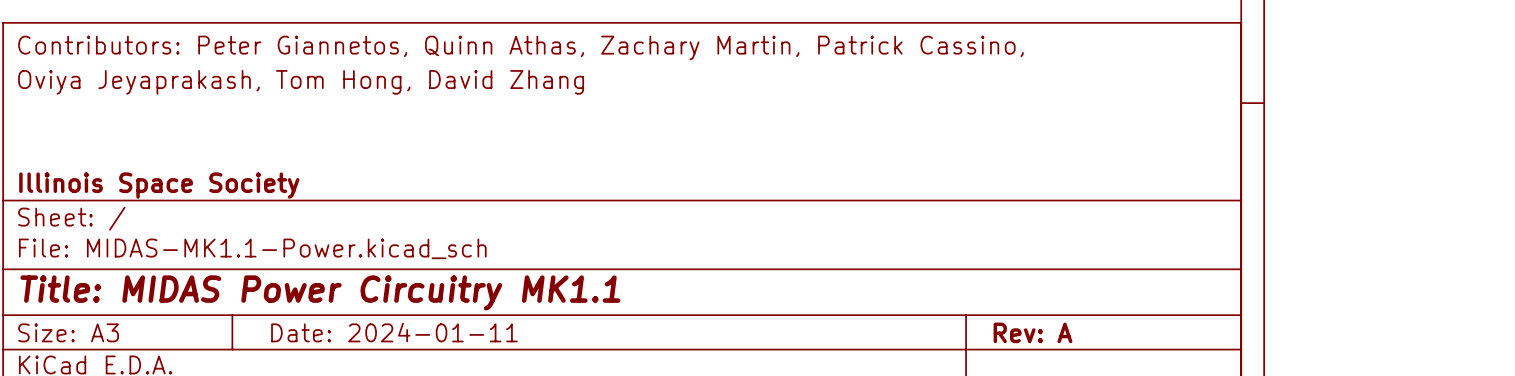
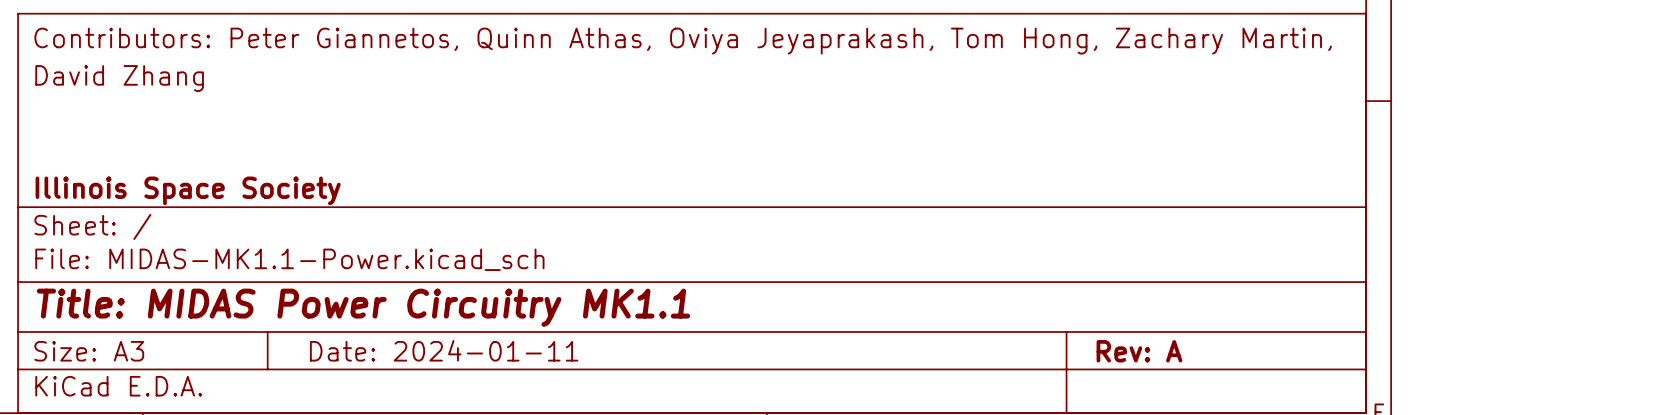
title block: Contributors: Peter Giannetos, Quinn Athas, Zachary Martin, Patrick Cassino, (520, 48) -> Contributors: Peter Giannetos, Quinn Athas, Oviya Jeyaprakash, Tom Hong, Zachary Martin, (683, 41)
title block: Oviya Jeyaprakash, Tom Hong, David Zhang (301, 82) -> David Zhang (119, 78)

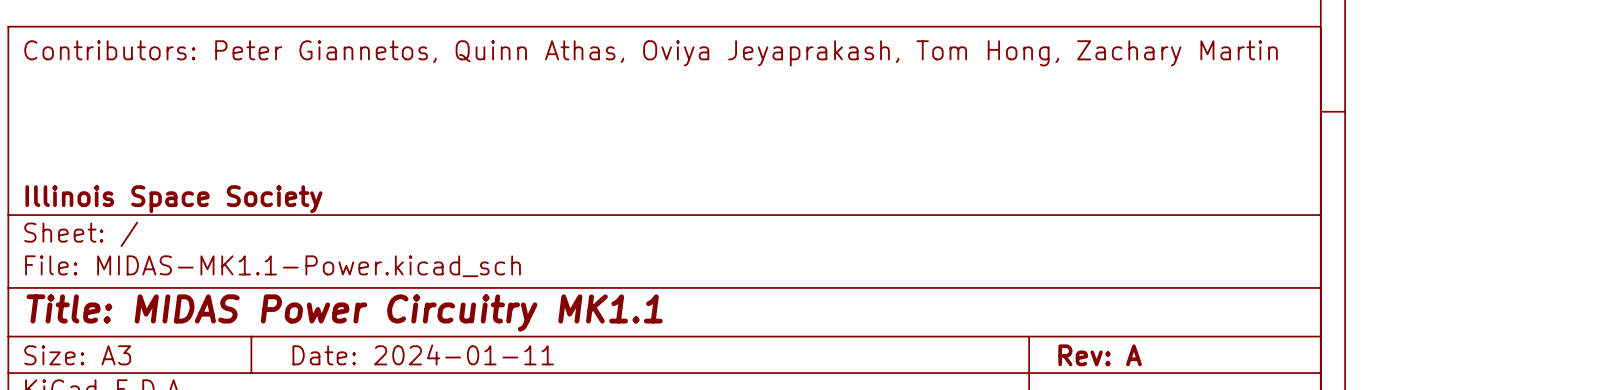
title block: Contributors: Peter Giannetos, Quinn Athas, Oviya Jeyaprakash, Tom Hong, Zachary Martin, (683, 41) -> Contributors: Peter Giannetos, Quinn Athas, Oviya Jeyaprakash, Tom Hong, Zachary Martin (651, 53)
title block: David Zhang (119, 78) -> none

